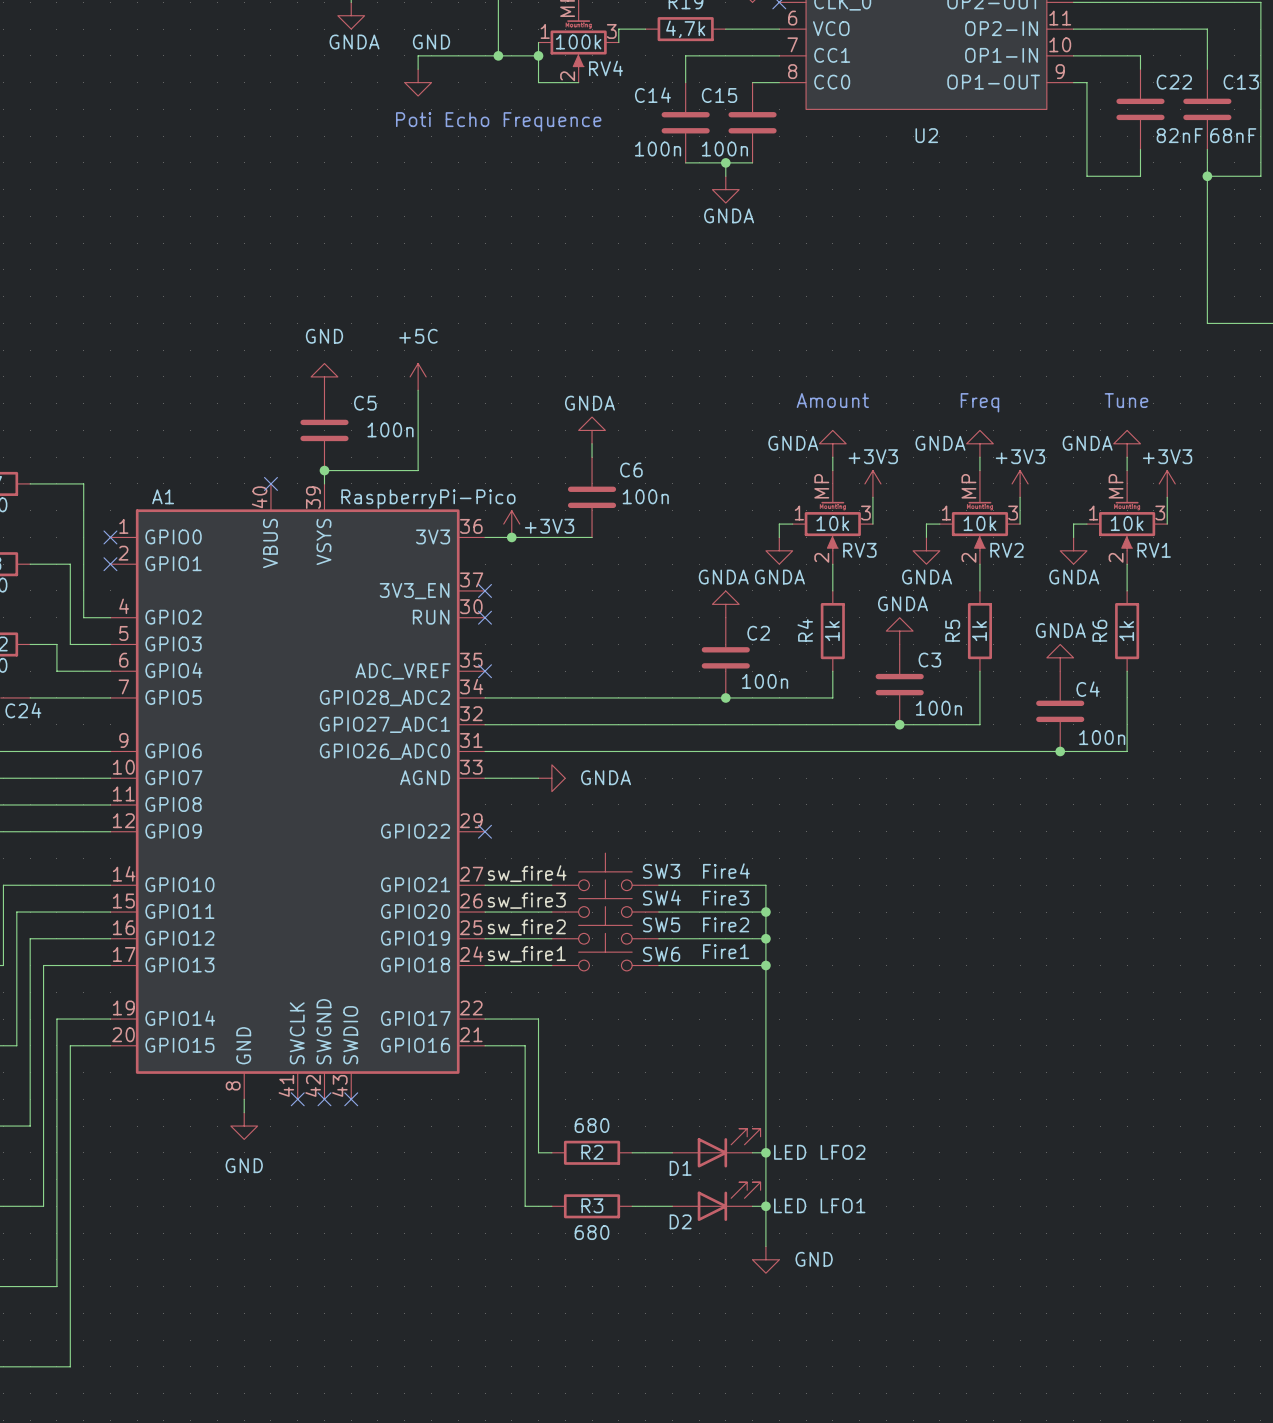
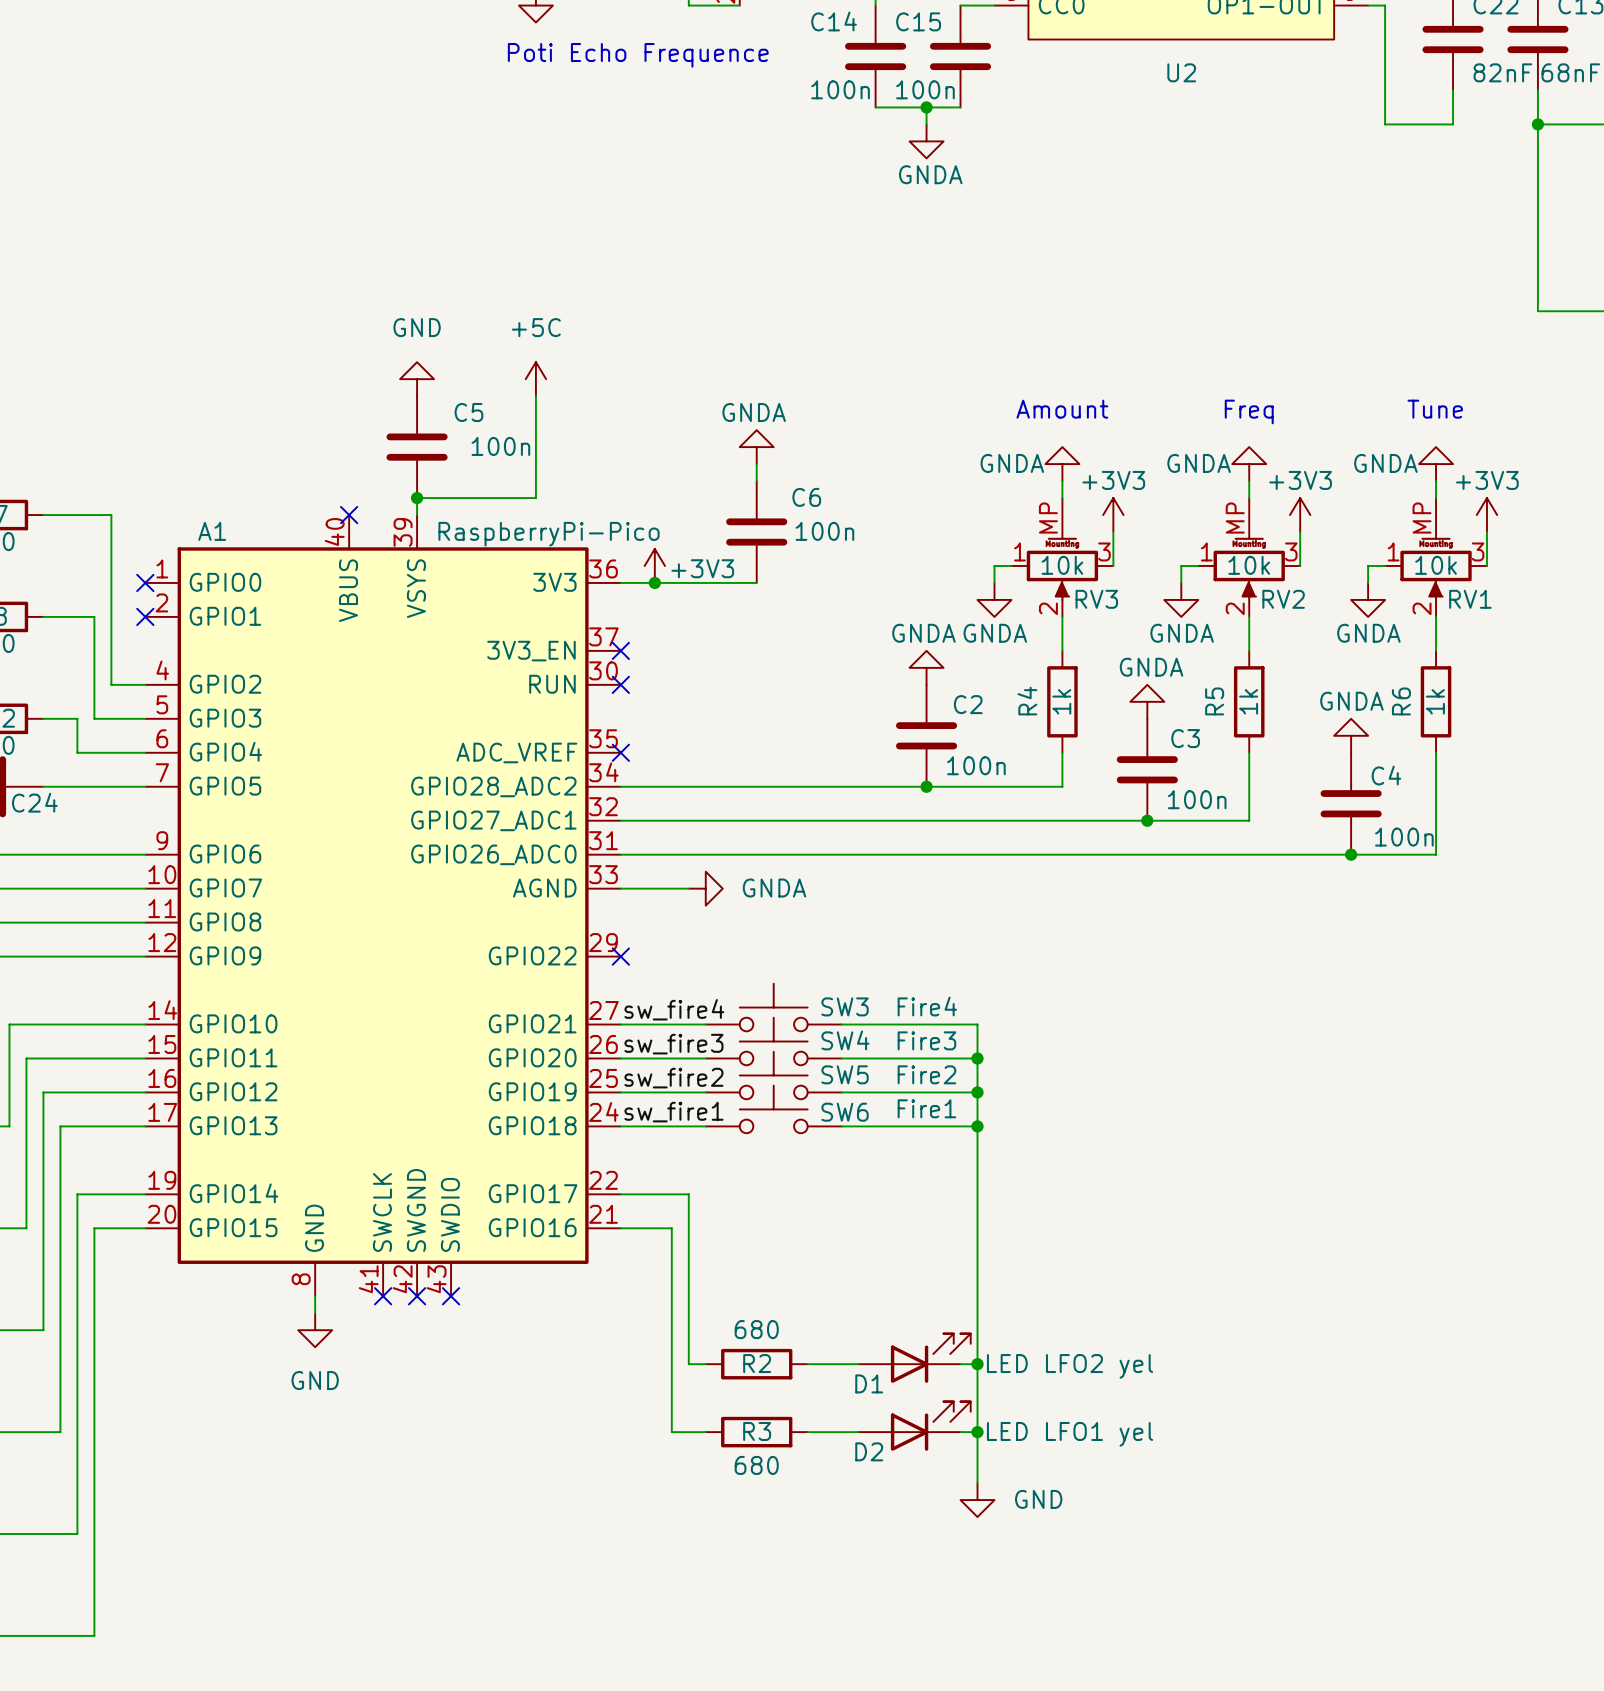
D1 value: LED LFO2 (819, 1152) -> LED LFO2 yel (1070, 1366)
D2 value: LED LFO1 (819, 1205) -> LED LFO1 yel (1070, 1434)

